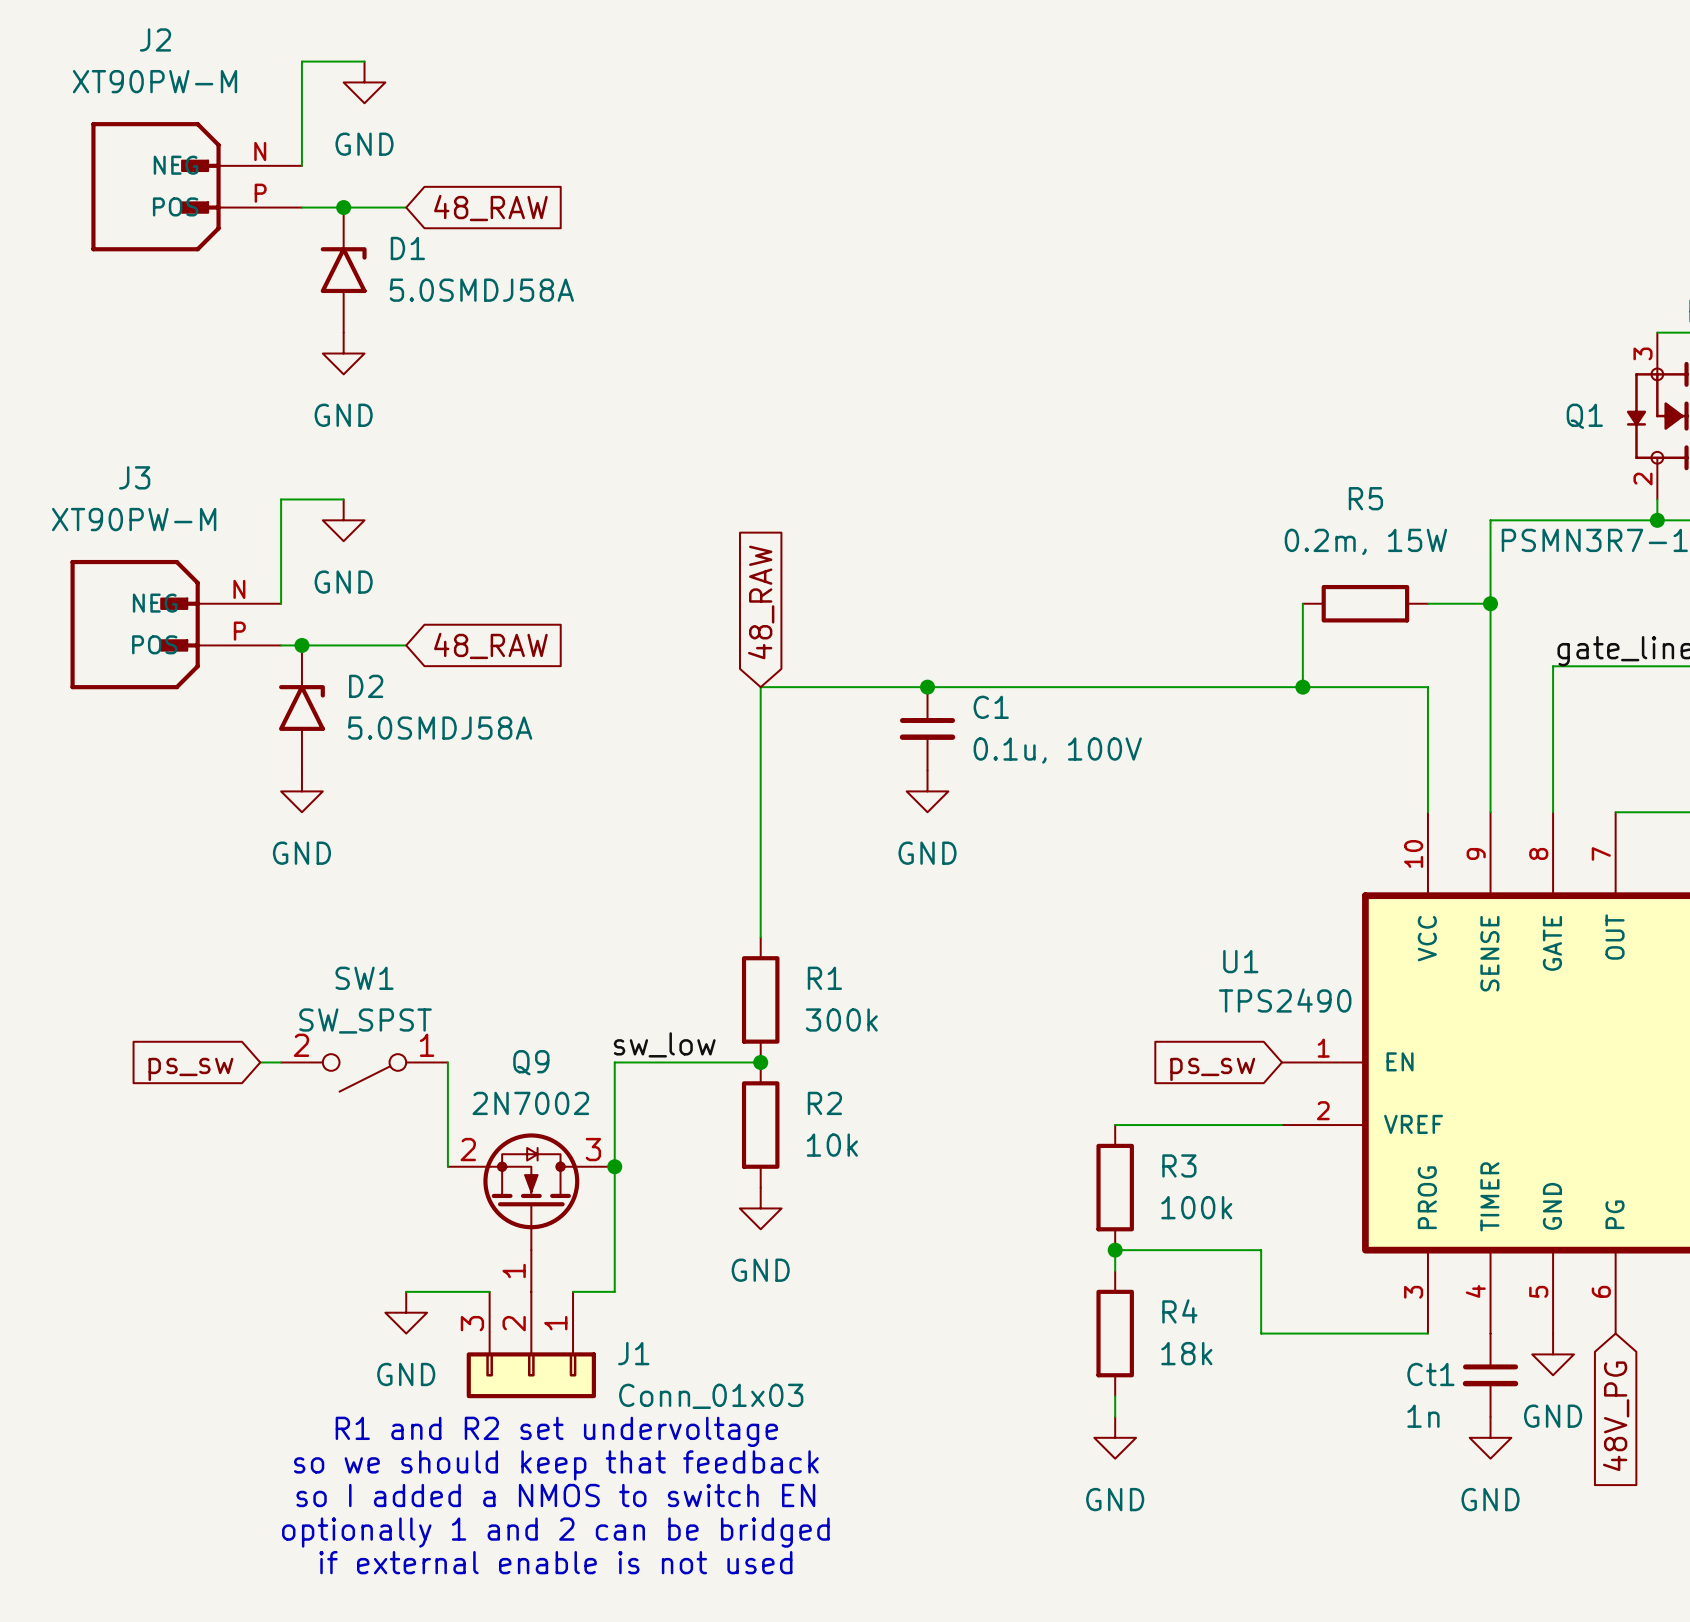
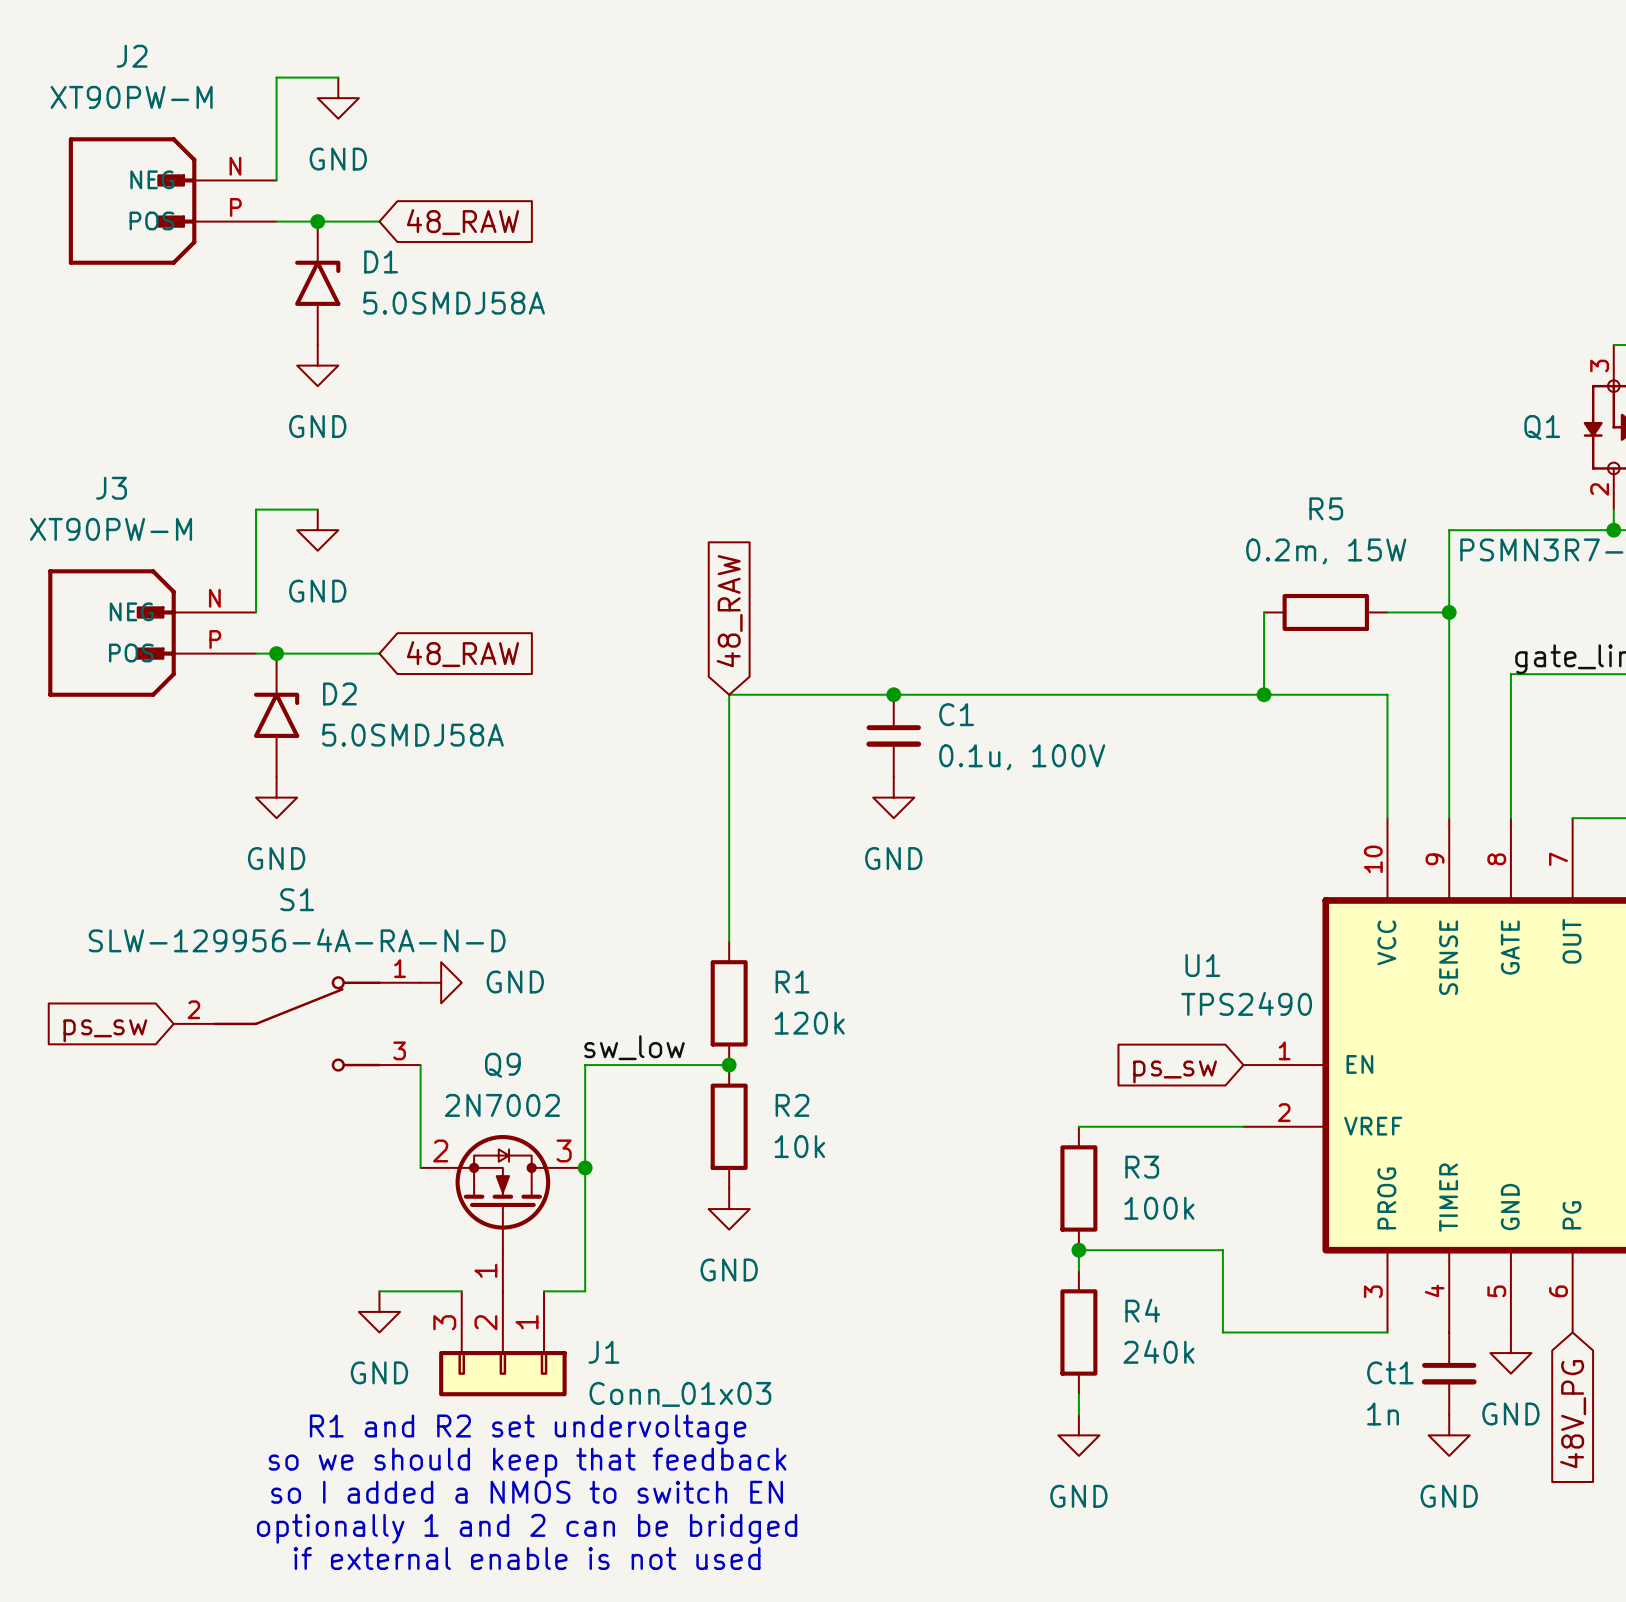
power symbol: none -> GND (441, 982)
S1: none -> SLW-129956-4A-RA-N-D (297, 1023)
R1 value: 300k (841, 1020) -> 120k (809, 1023)
wire: (260, 1062) (281, 1062) -> none
global label position: ps_sw (190, 1069) -> ps_sw (105, 1030)
SW1: SW_SPST (364, 1072) -> none
R4 value: 18k (1186, 1353) -> 240k (1158, 1351)

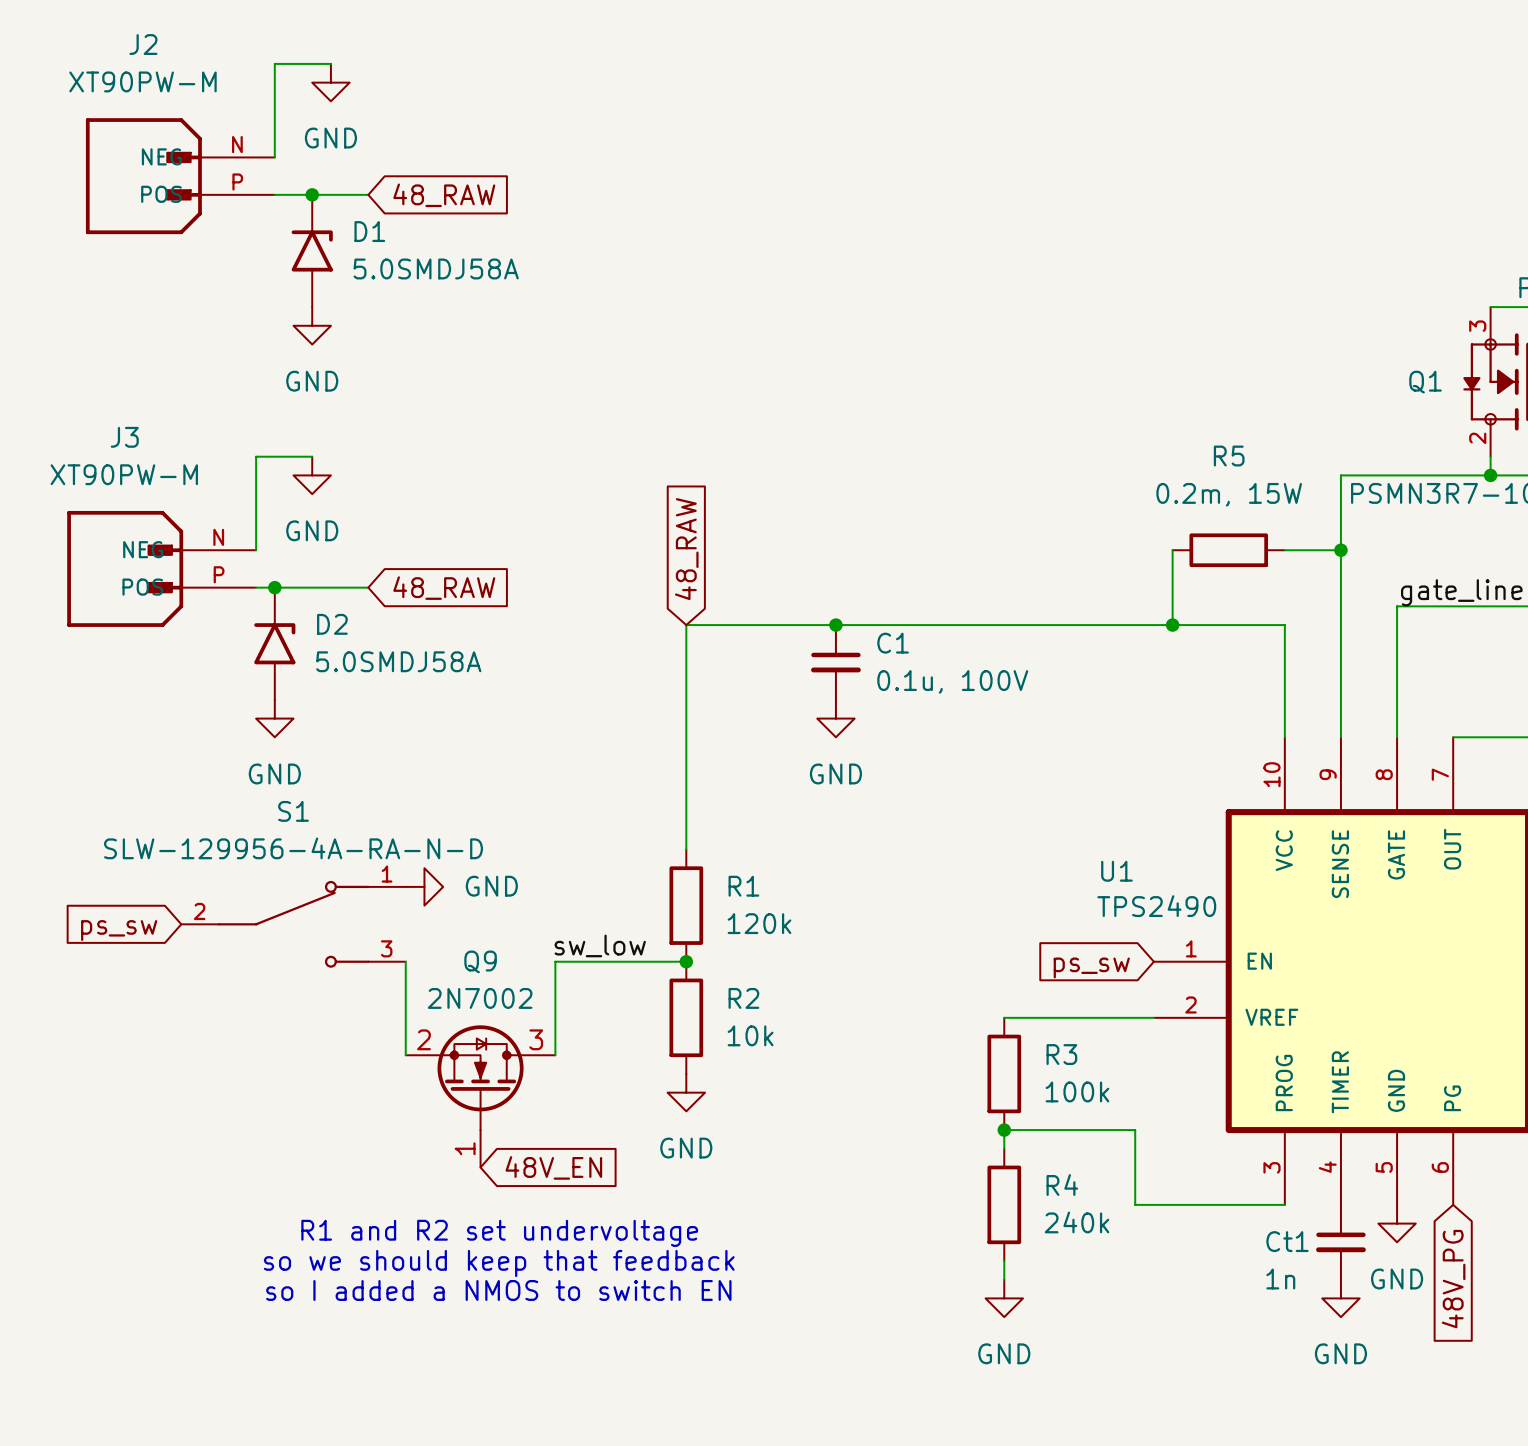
wire: (585, 1167) (585, 1291) (544, 1291) -> none
junction: (585, 1167) -> none
wire: (379, 1291) (461, 1291) -> none
global label: none -> 48V_EN (553, 1167)
power symbol: GND (379, 1311) -> none
J1: Conn_01x03 (502, 1343) -> none
text: none -> R1 and R2 set undervoltage (499, 1233)
text: R1 and R2 set undervoltage (528, 1429) -> so I added a NMOS to switch EN (498, 1290)
text position: so we should keep that feedback (527, 1462) -> so we should keep that feedback (499, 1263)
text: so I added a NMOS to switch EN (527, 1492) -> none
text: optionally 1 and 2 can be bridged (527, 1528) -> none
text: if external enable is not used (527, 1558) -> none

